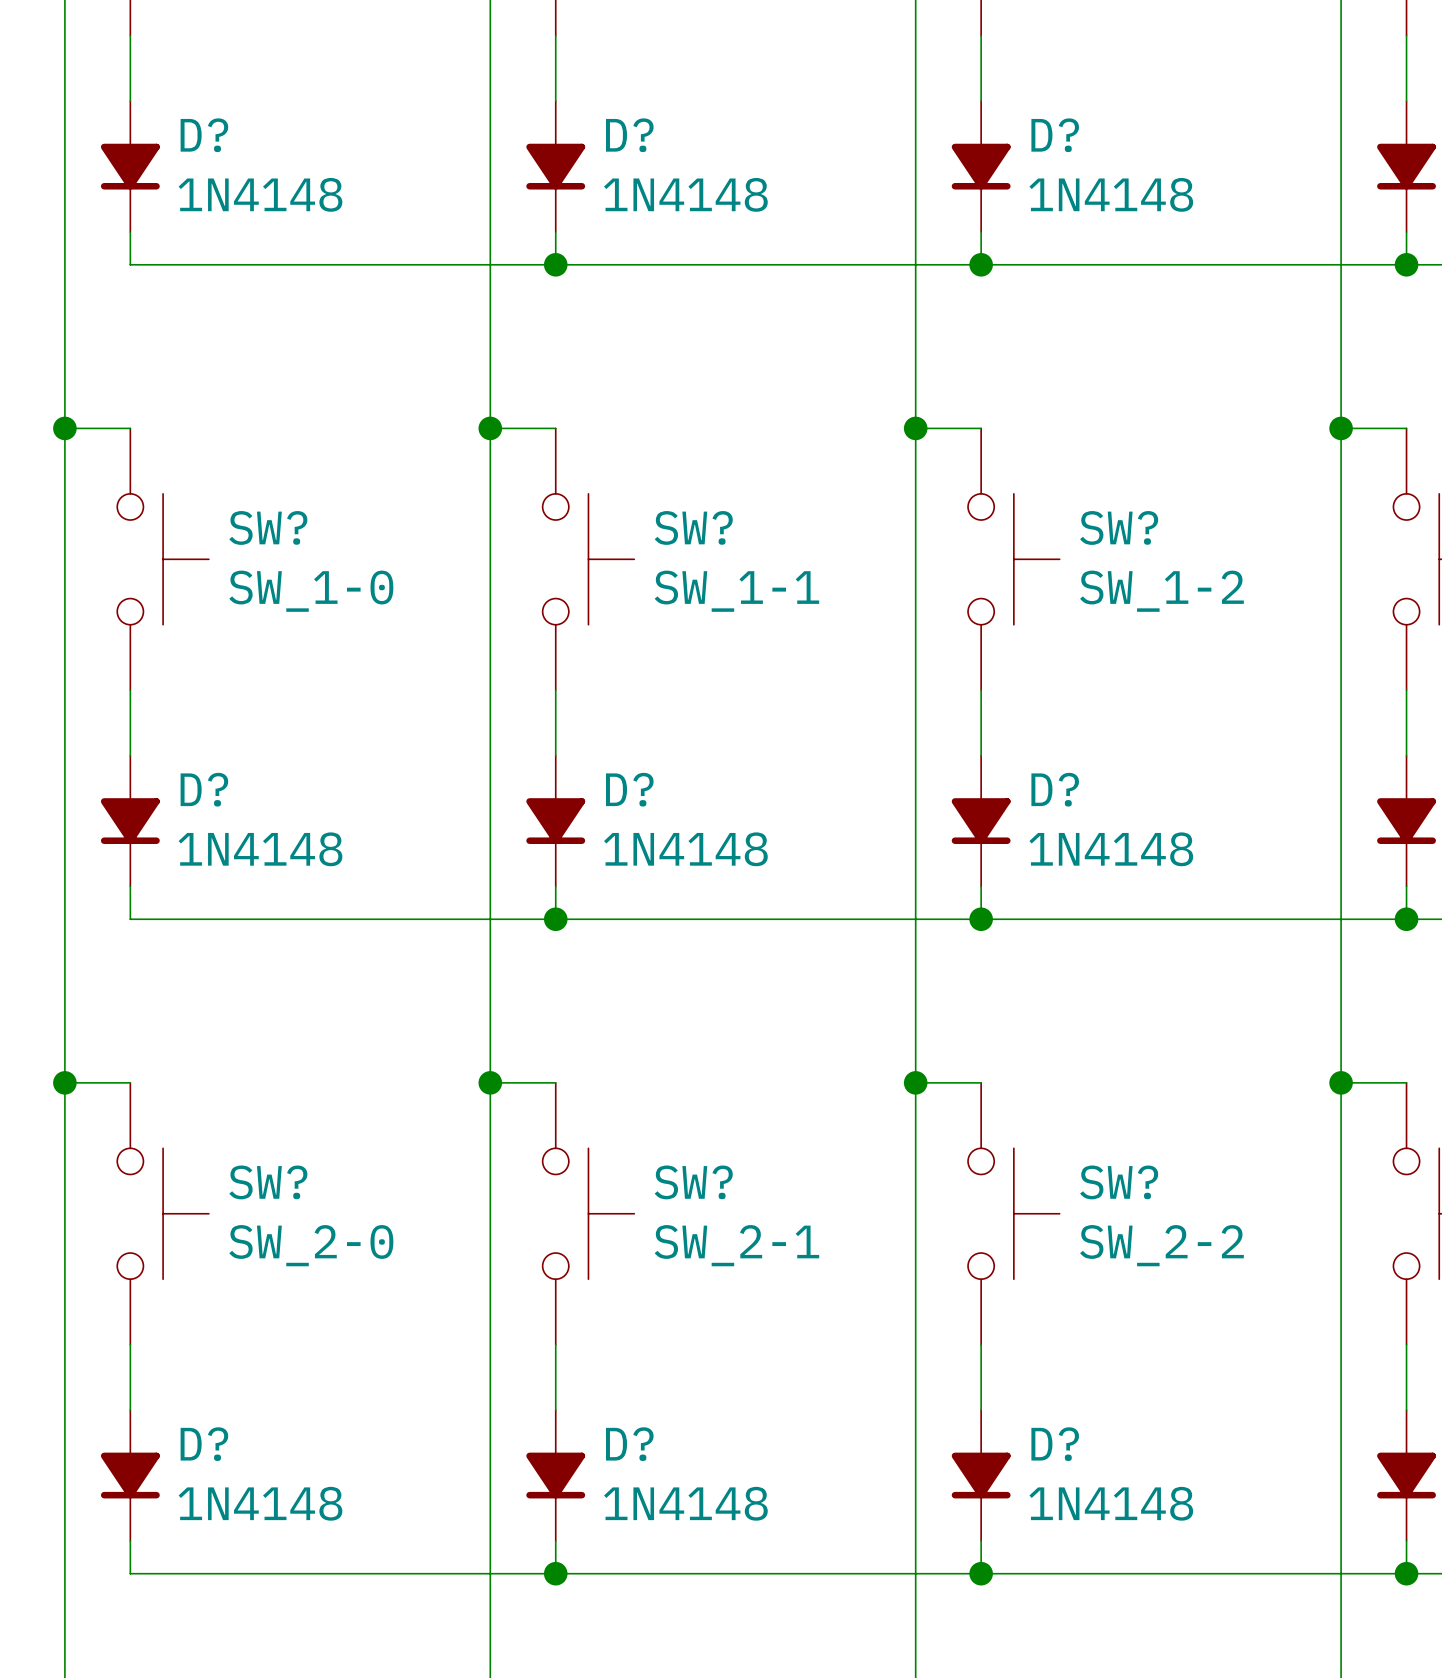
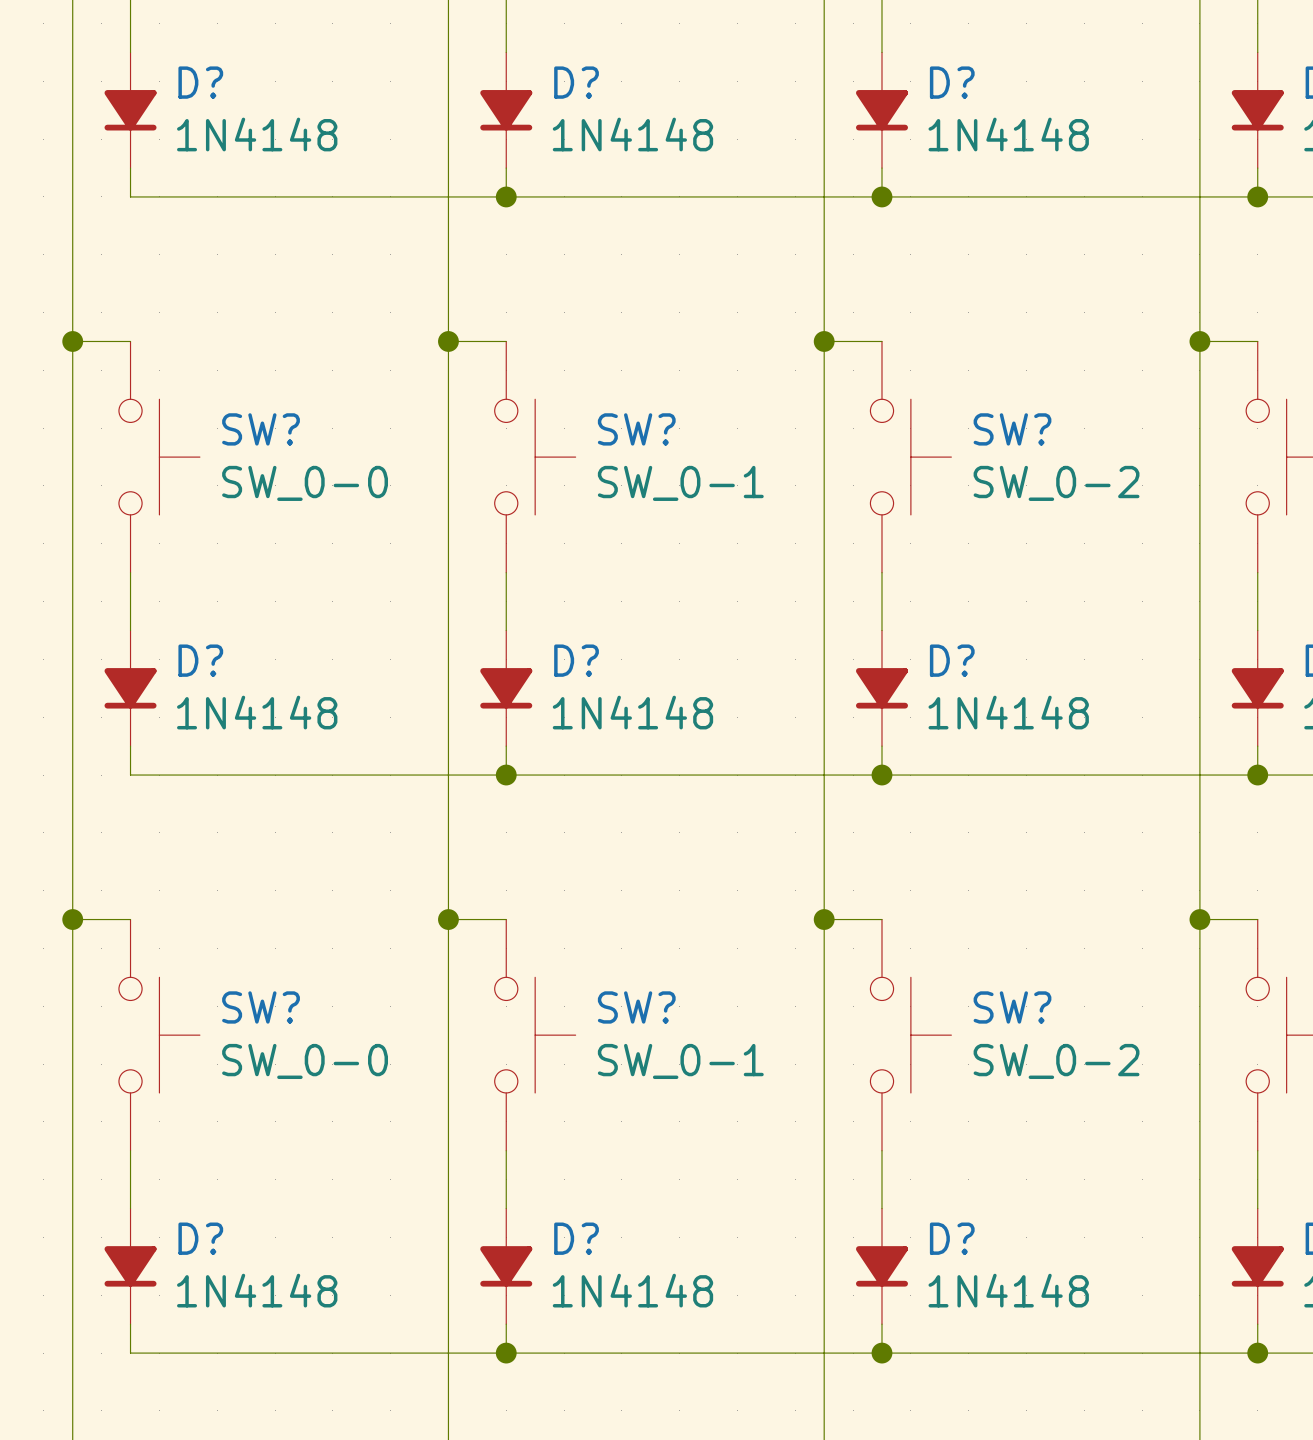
SW? value: SW_1-0 (311, 591) -> SW_0-0 (305, 483)
SW? value: SW_1-1 (736, 591) -> SW_0-1 (680, 483)
SW? value: SW_1-2 (1161, 591) -> SW_0-2 (1056, 483)
SW? value: SW_2-0 (311, 1245) -> SW_0-0 (305, 1061)
SW? value: SW_2-1 (736, 1245) -> SW_0-1 (680, 1061)
SW? value: SW_2-2 (1161, 1245) -> SW_0-2 (1056, 1061)

